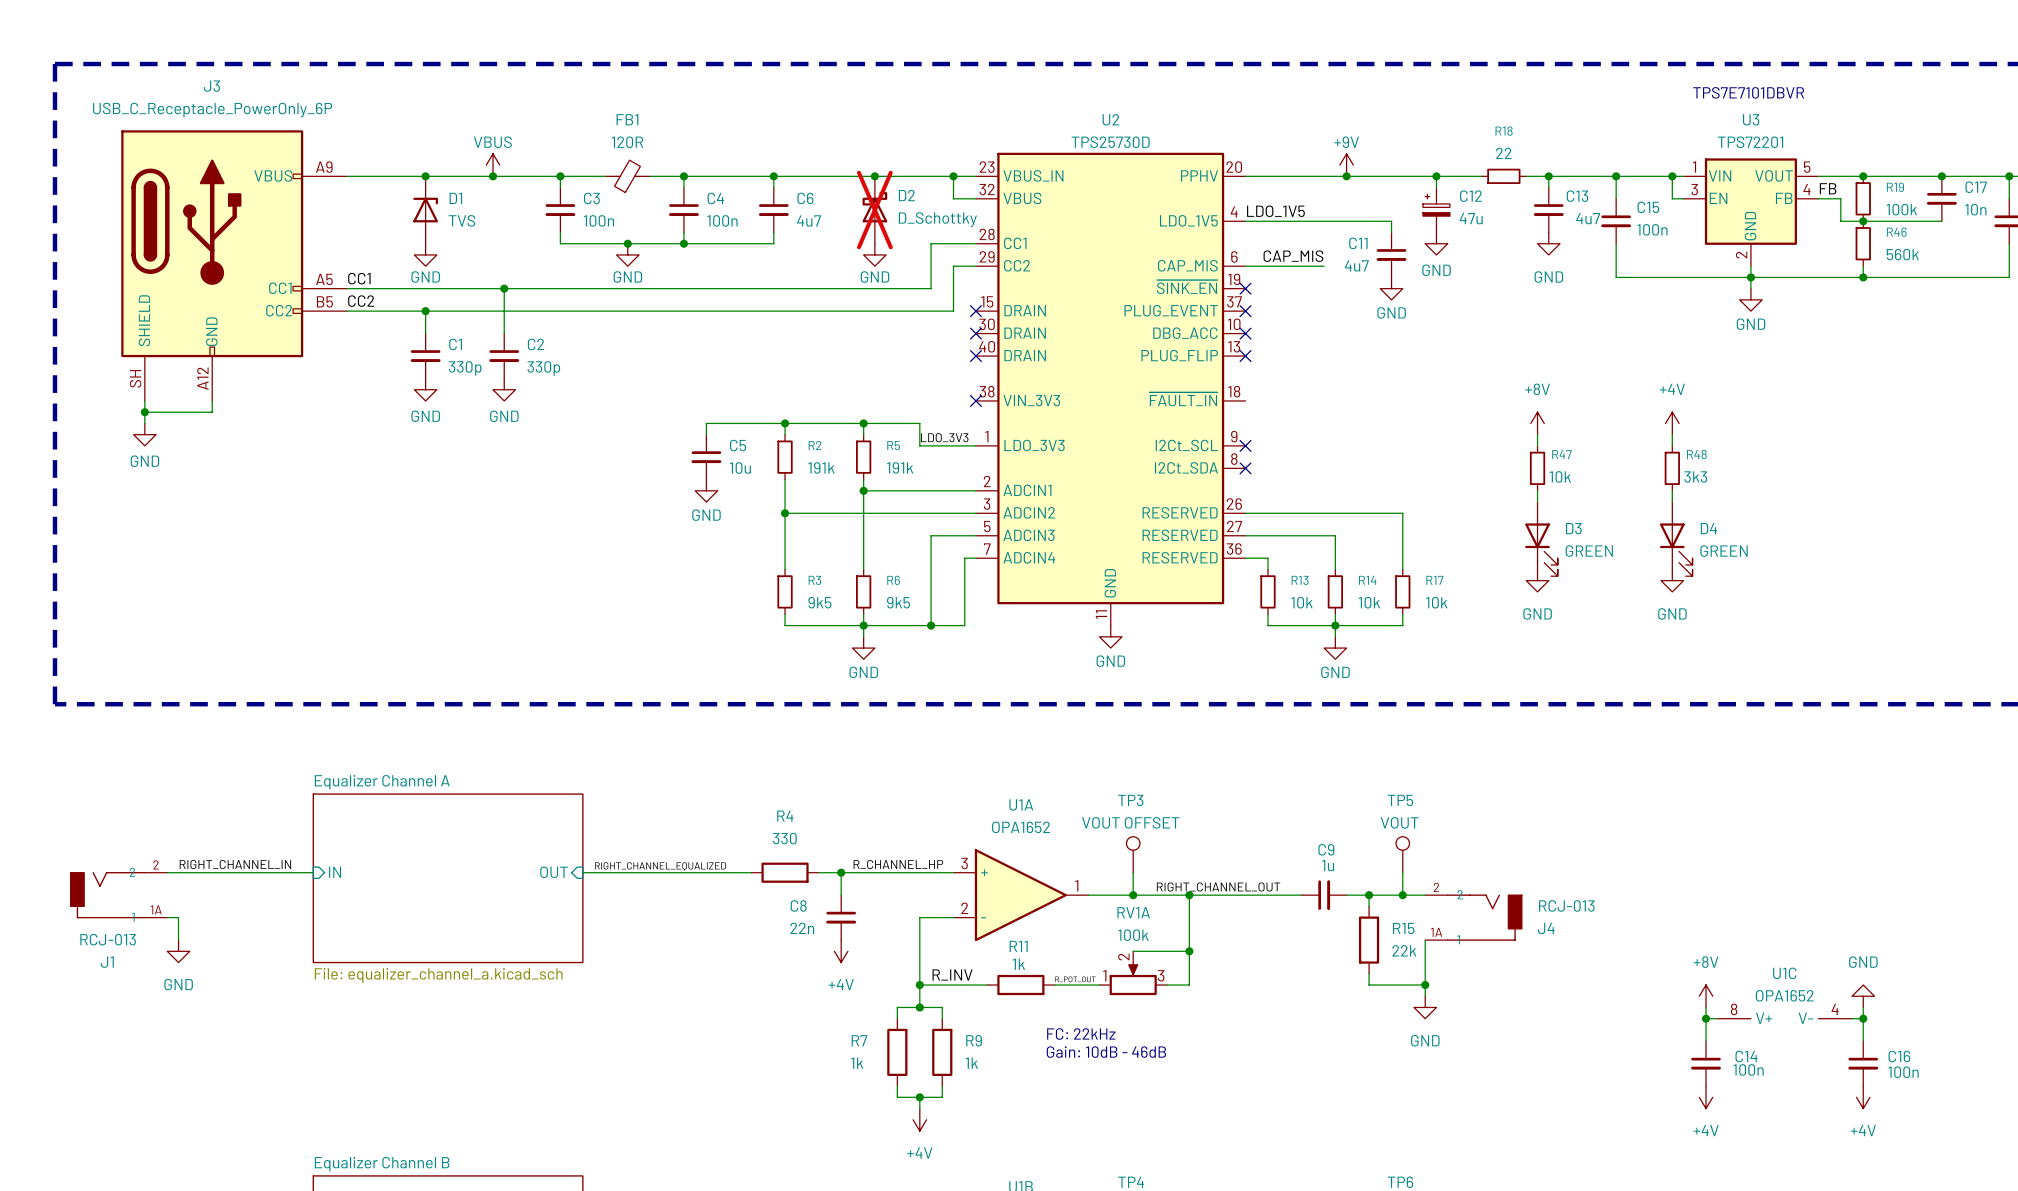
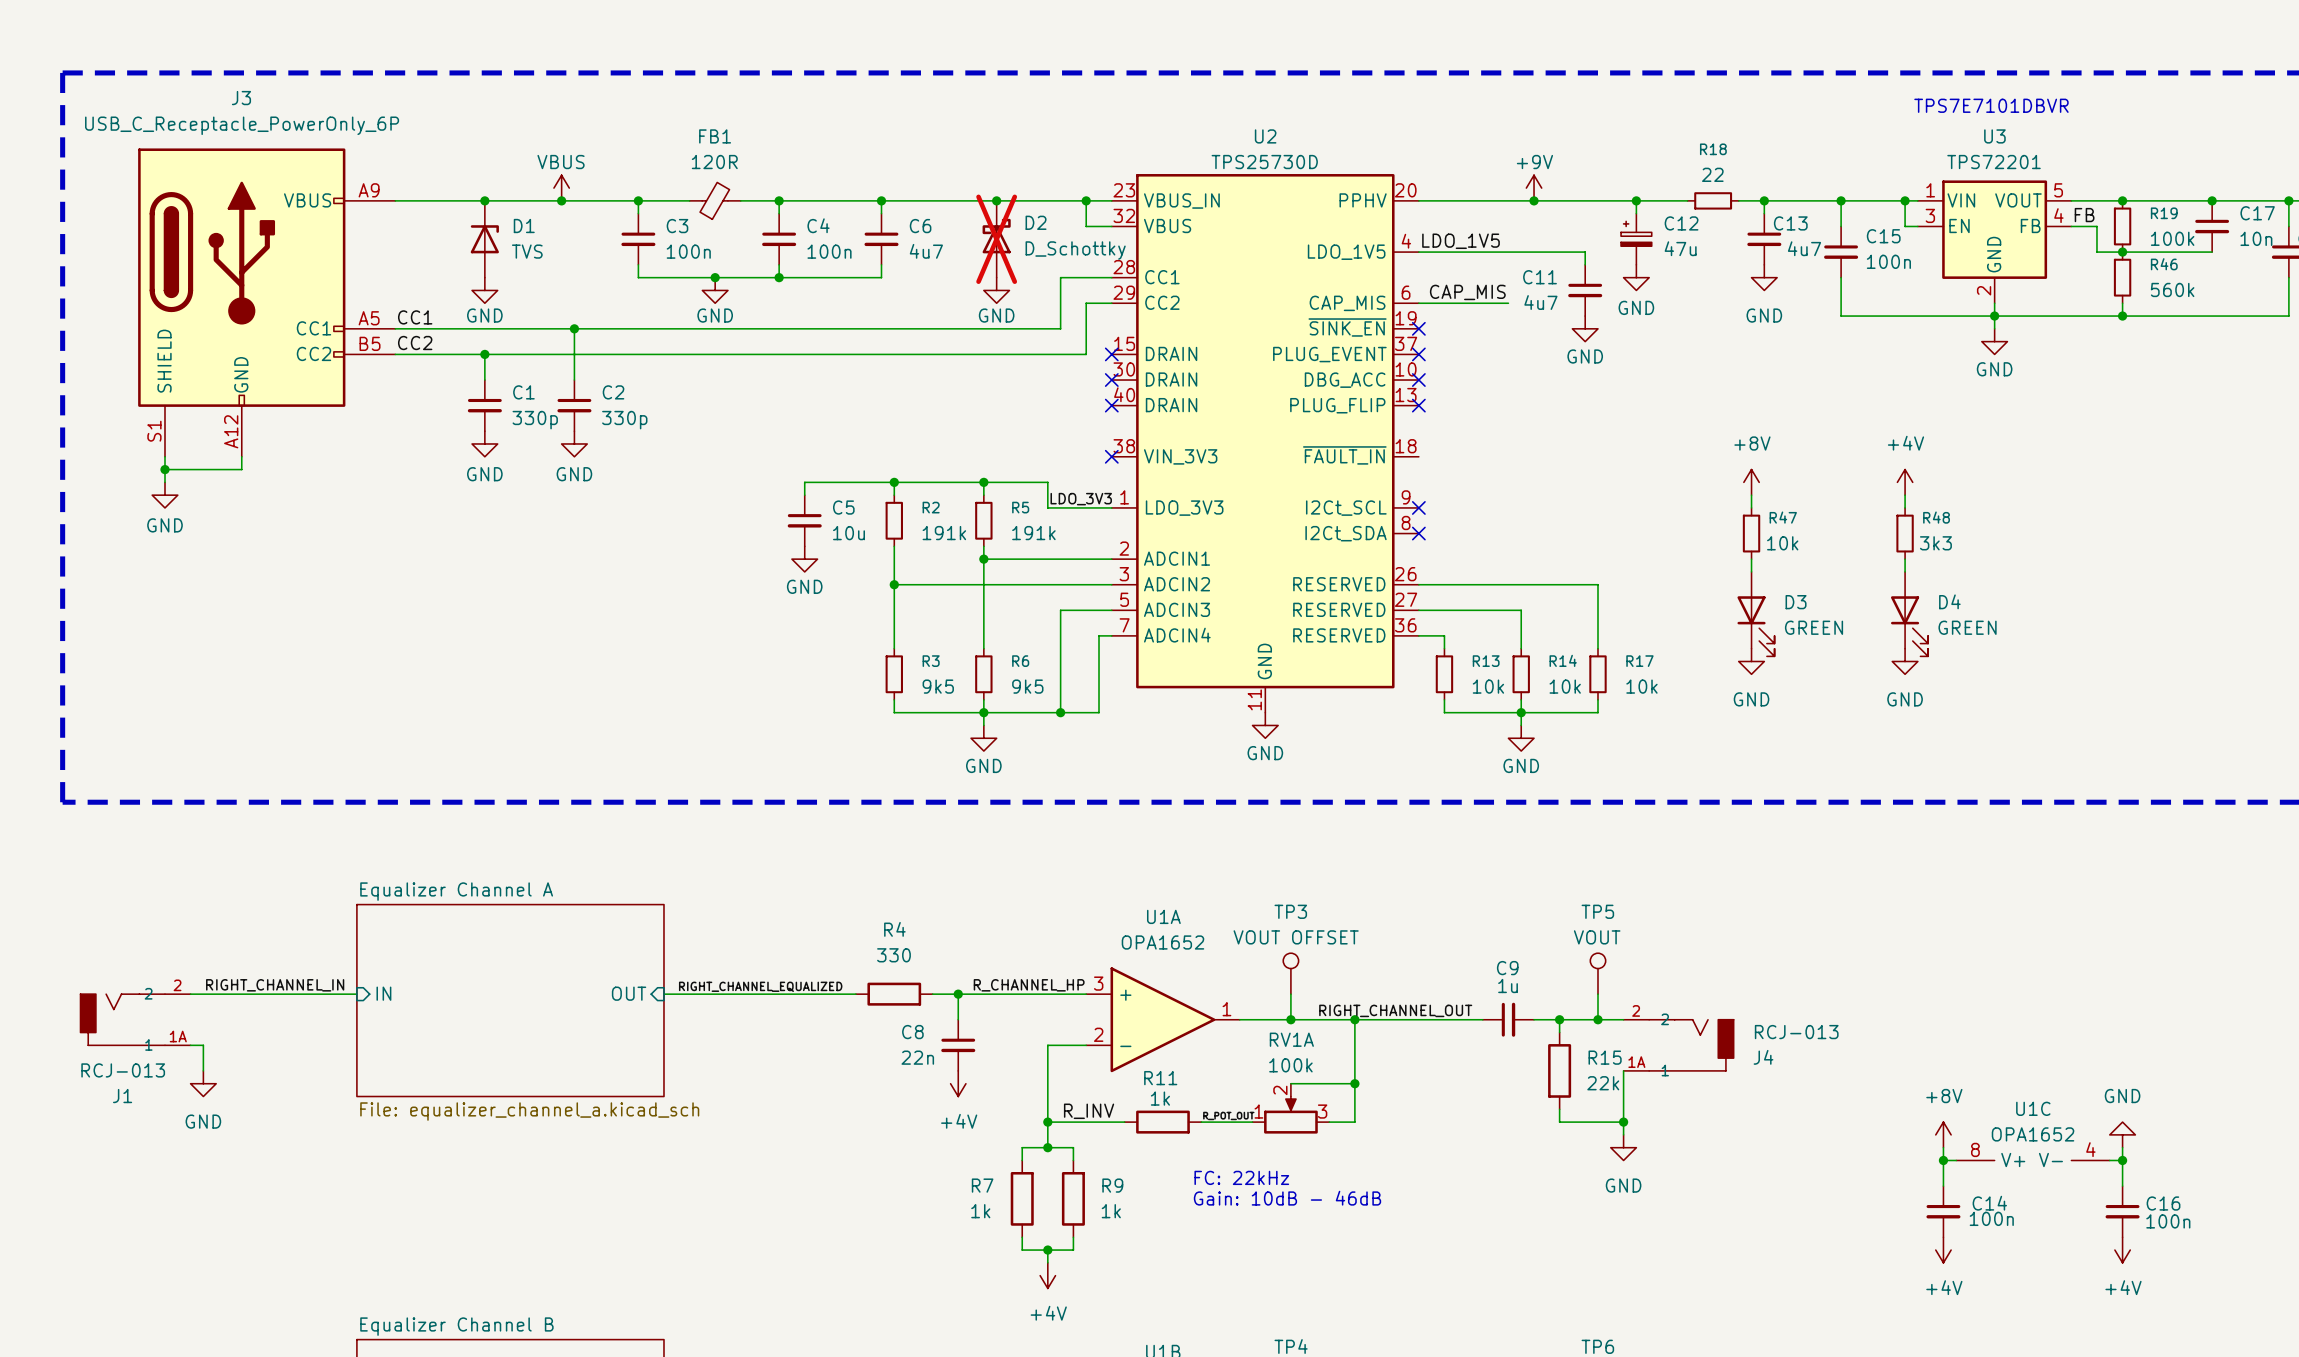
J3 pin number: SH (135, 378) -> S1 (154, 431)

